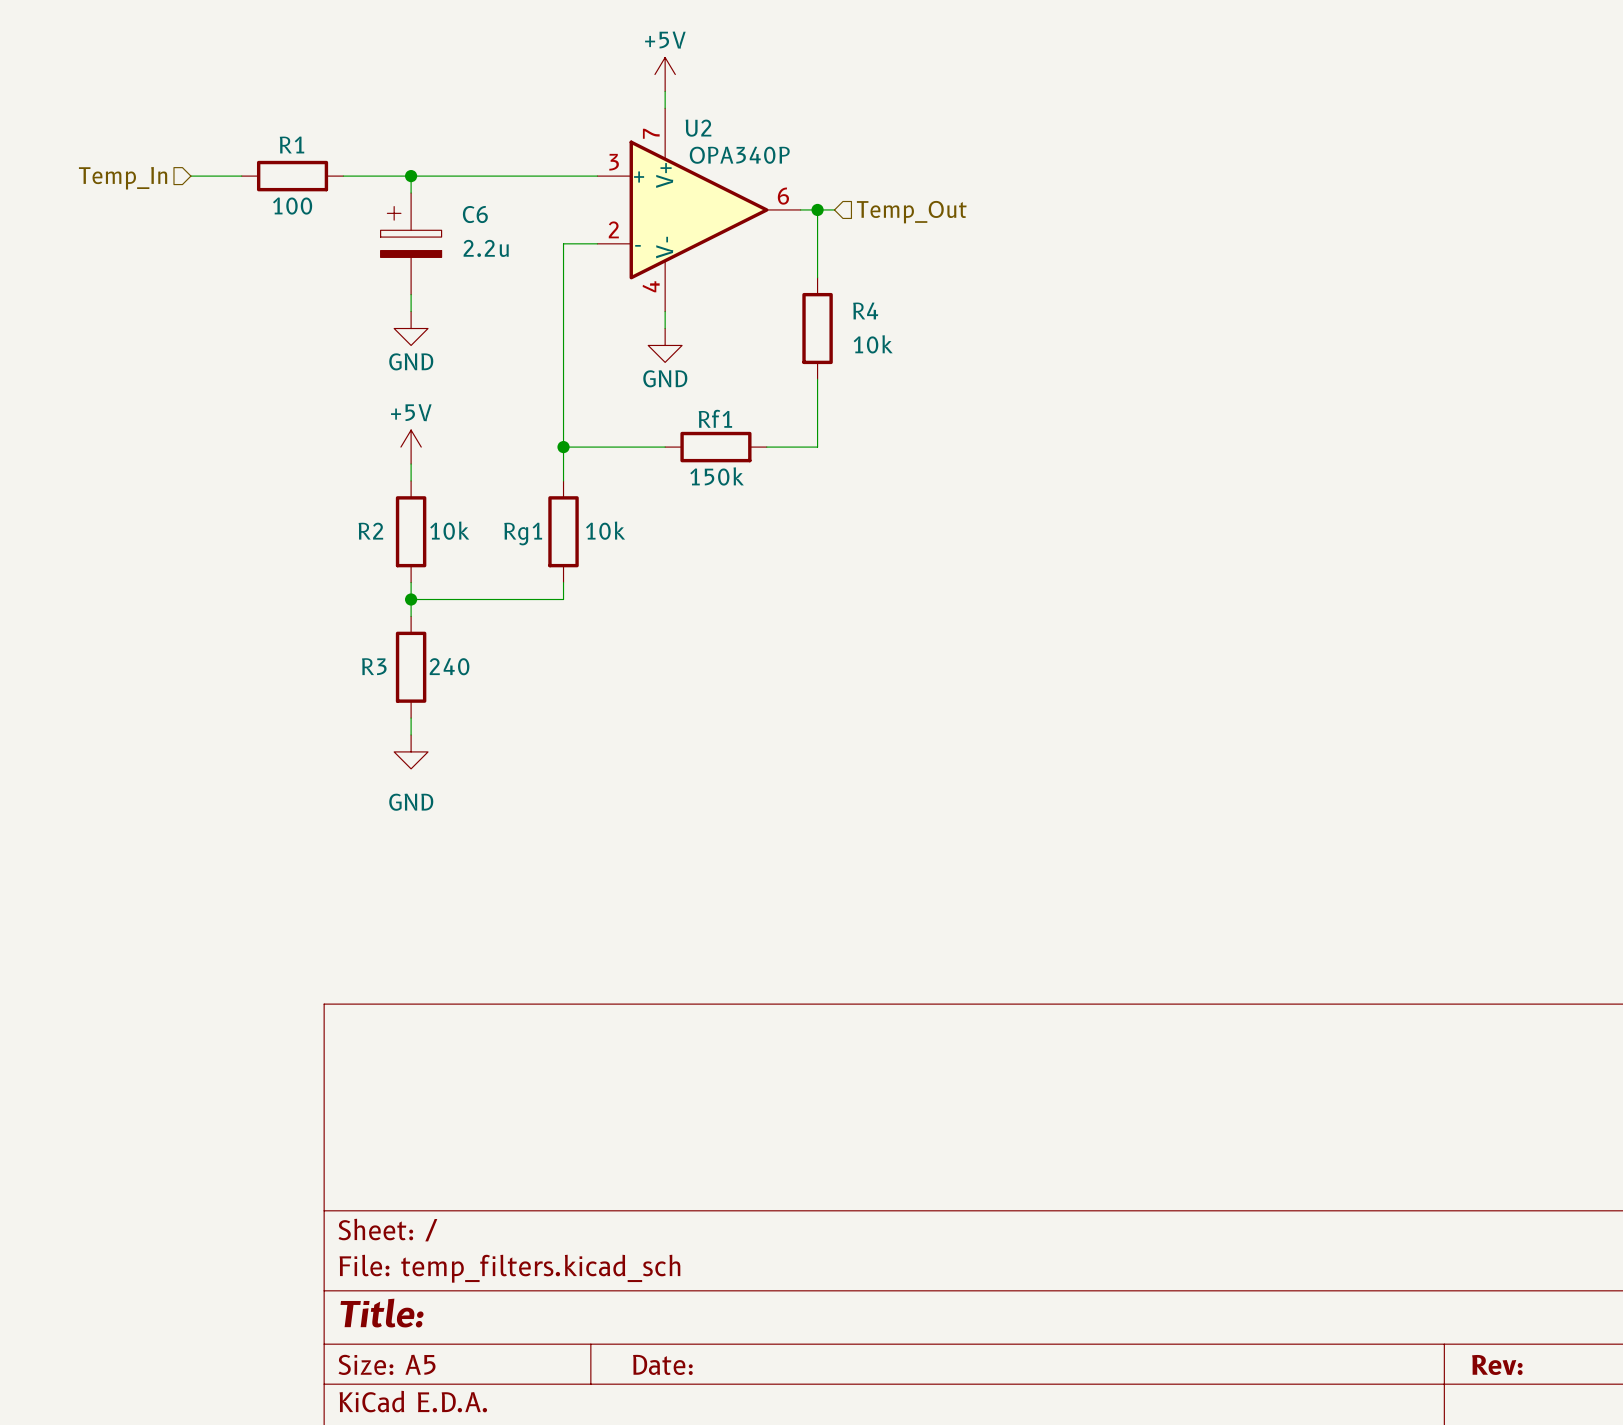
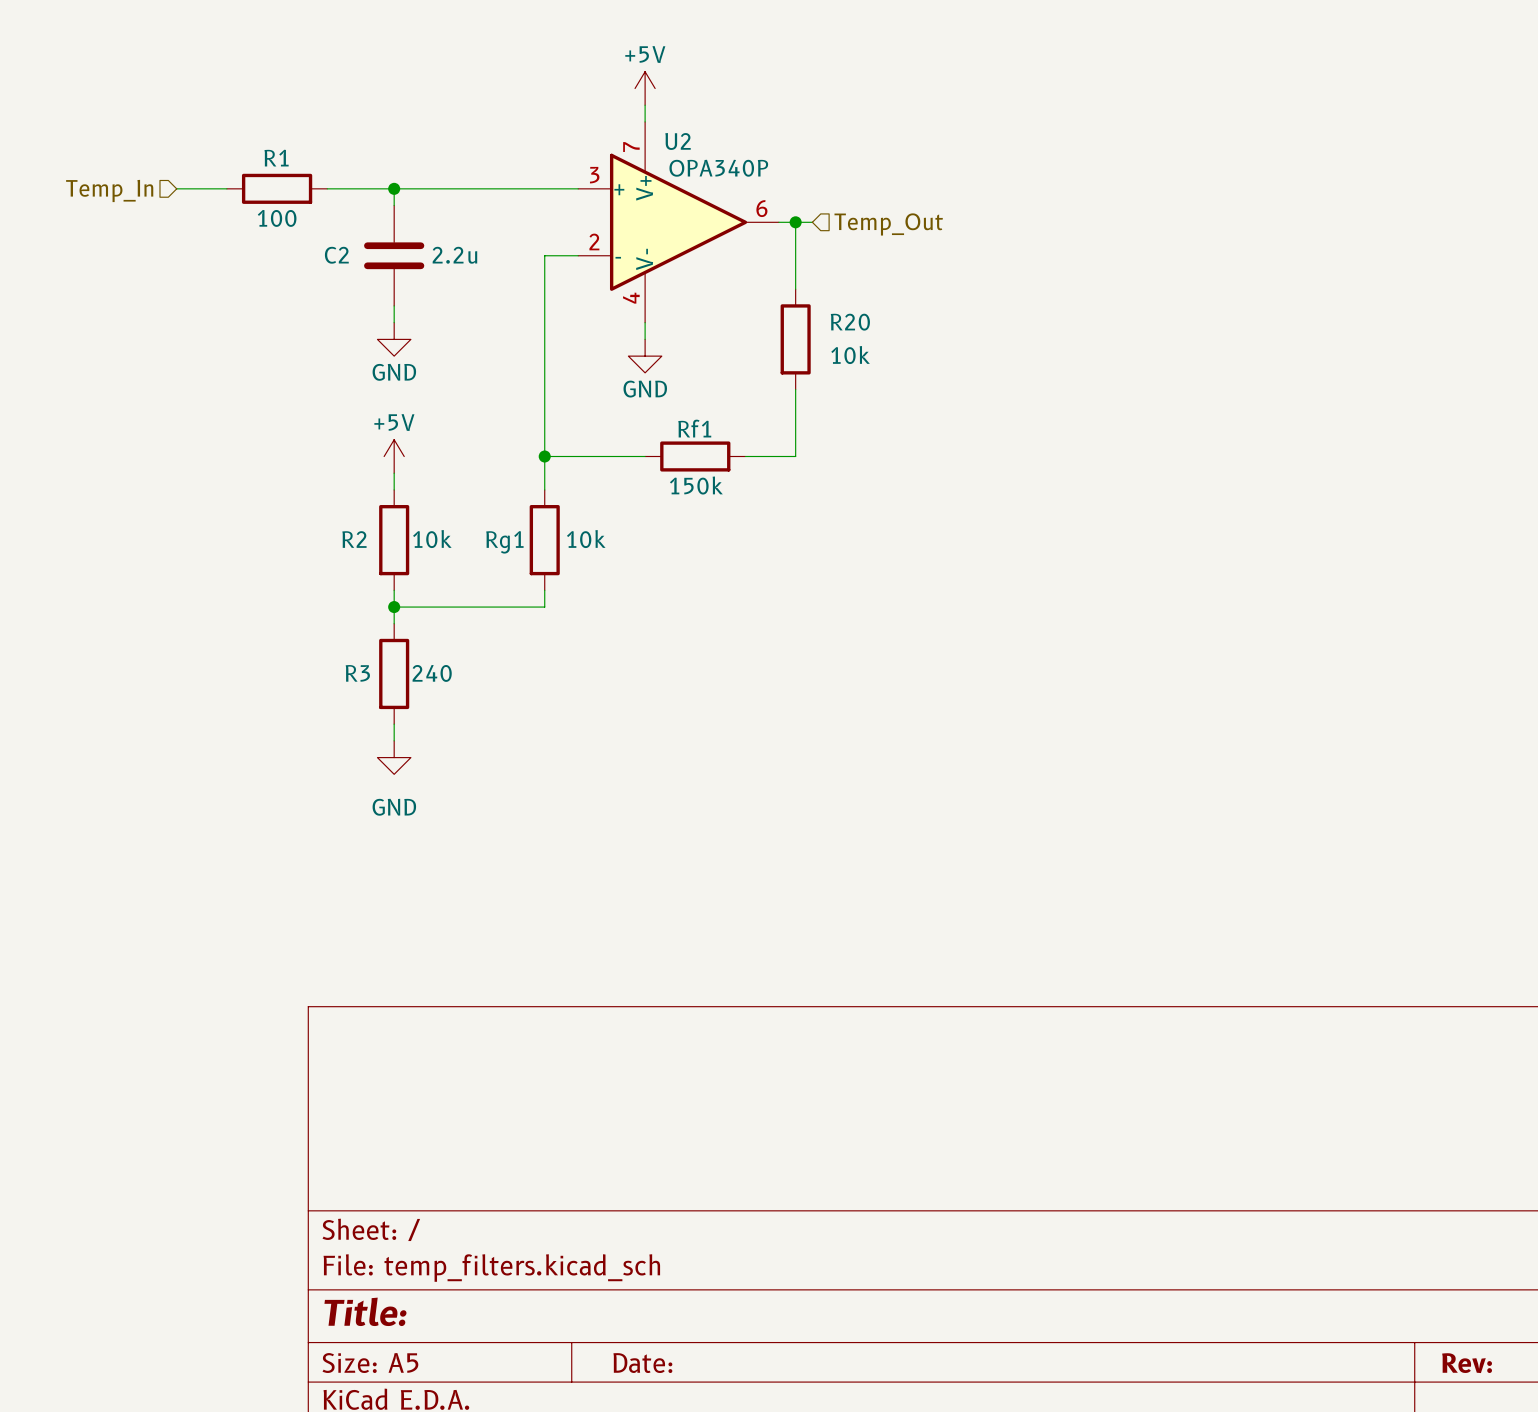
C6: 2.2u (411, 243) -> none
C2: none -> 2.2u (394, 255)
R4 name: R4 (865, 310) -> R20 (850, 322)

